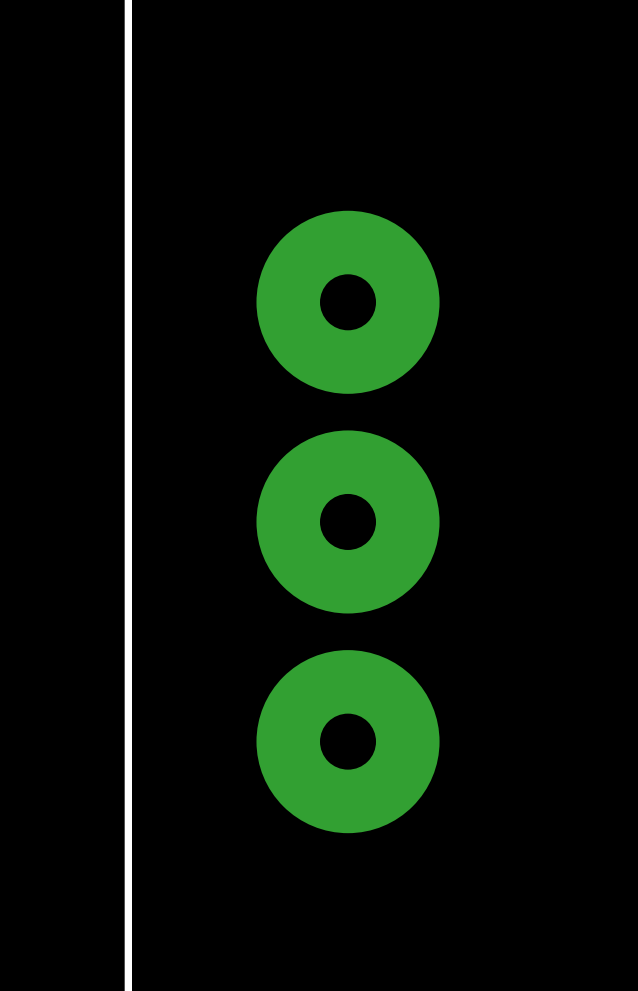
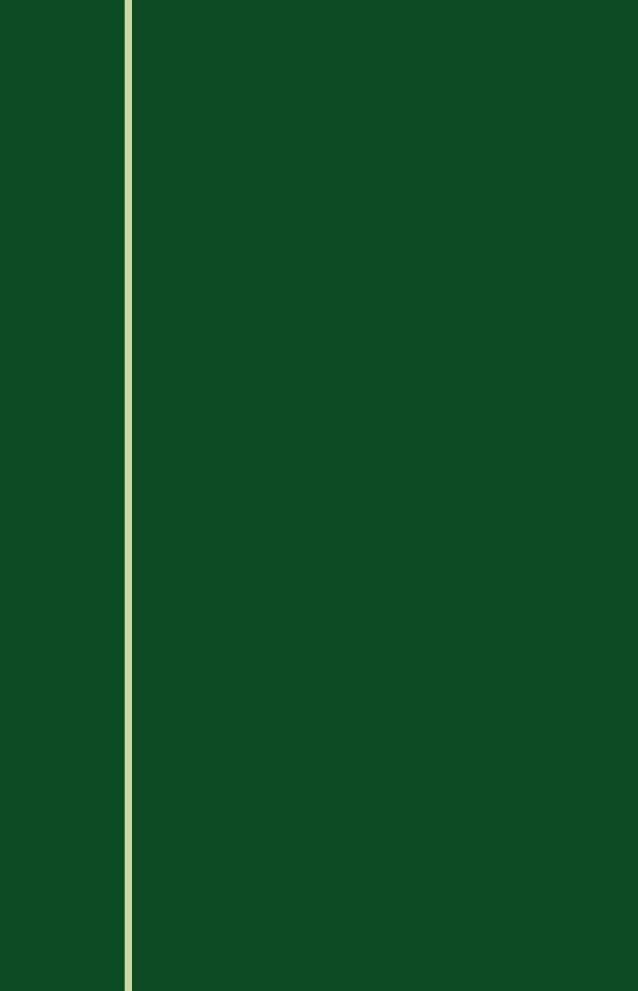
part: (348, 302) -> none
part: (348, 521) -> none
part: (348, 741) -> none

